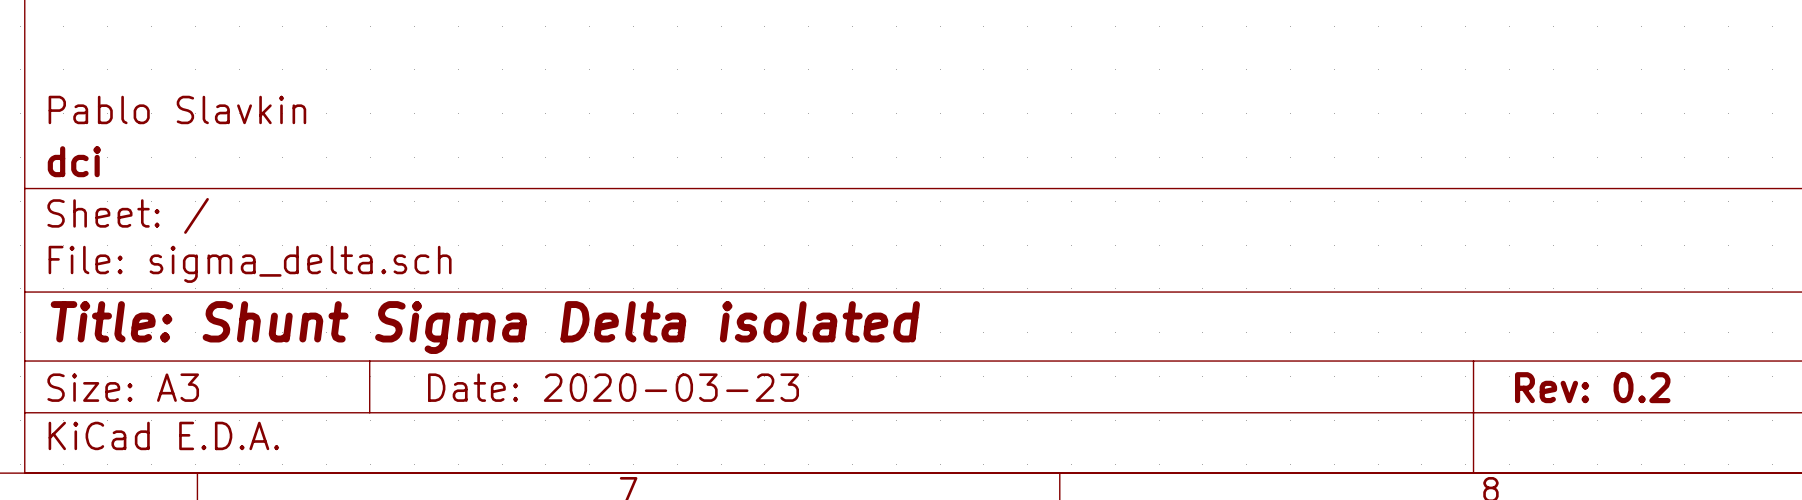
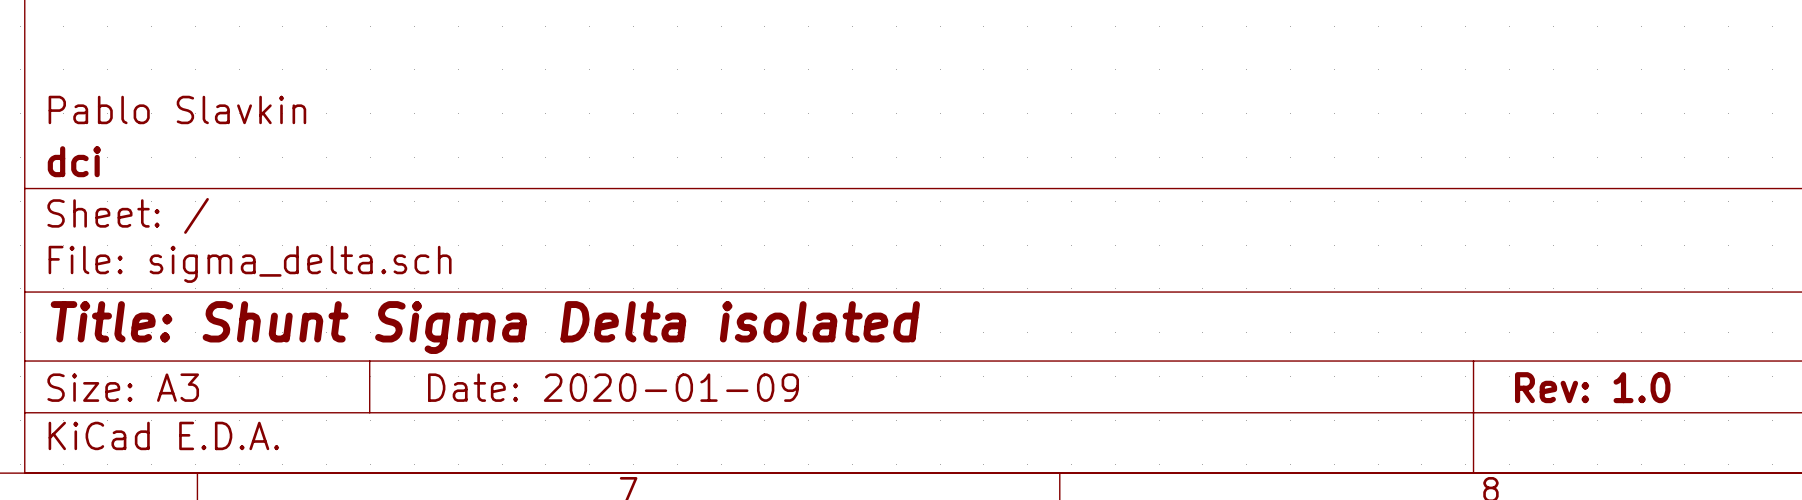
title block: Date: 2020-03-23 (613, 387) -> Date: 2020-01-09 (613, 387)
title block: Rev: 0.2 (1592, 387) -> Rev: 1.0 (1592, 387)

